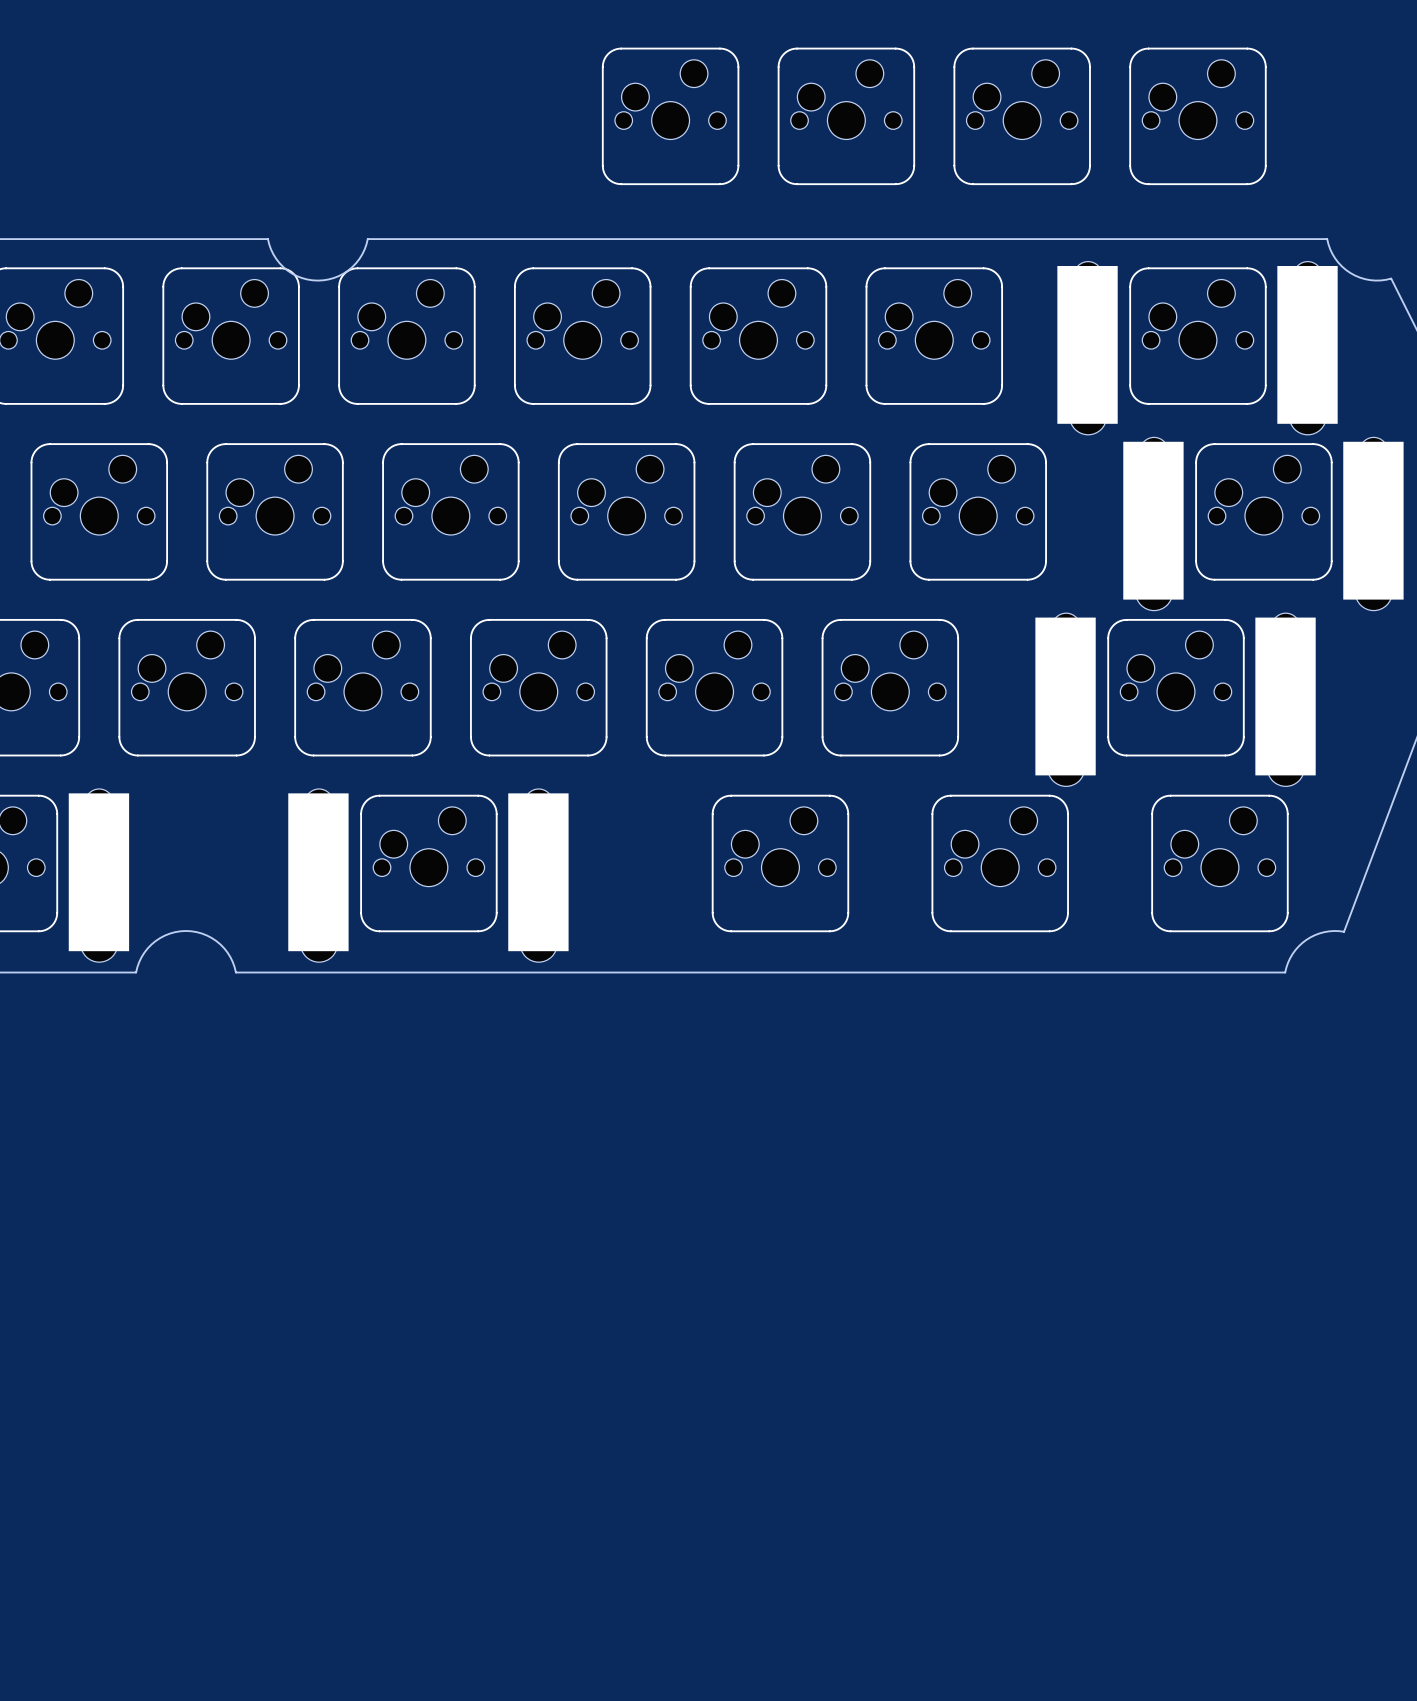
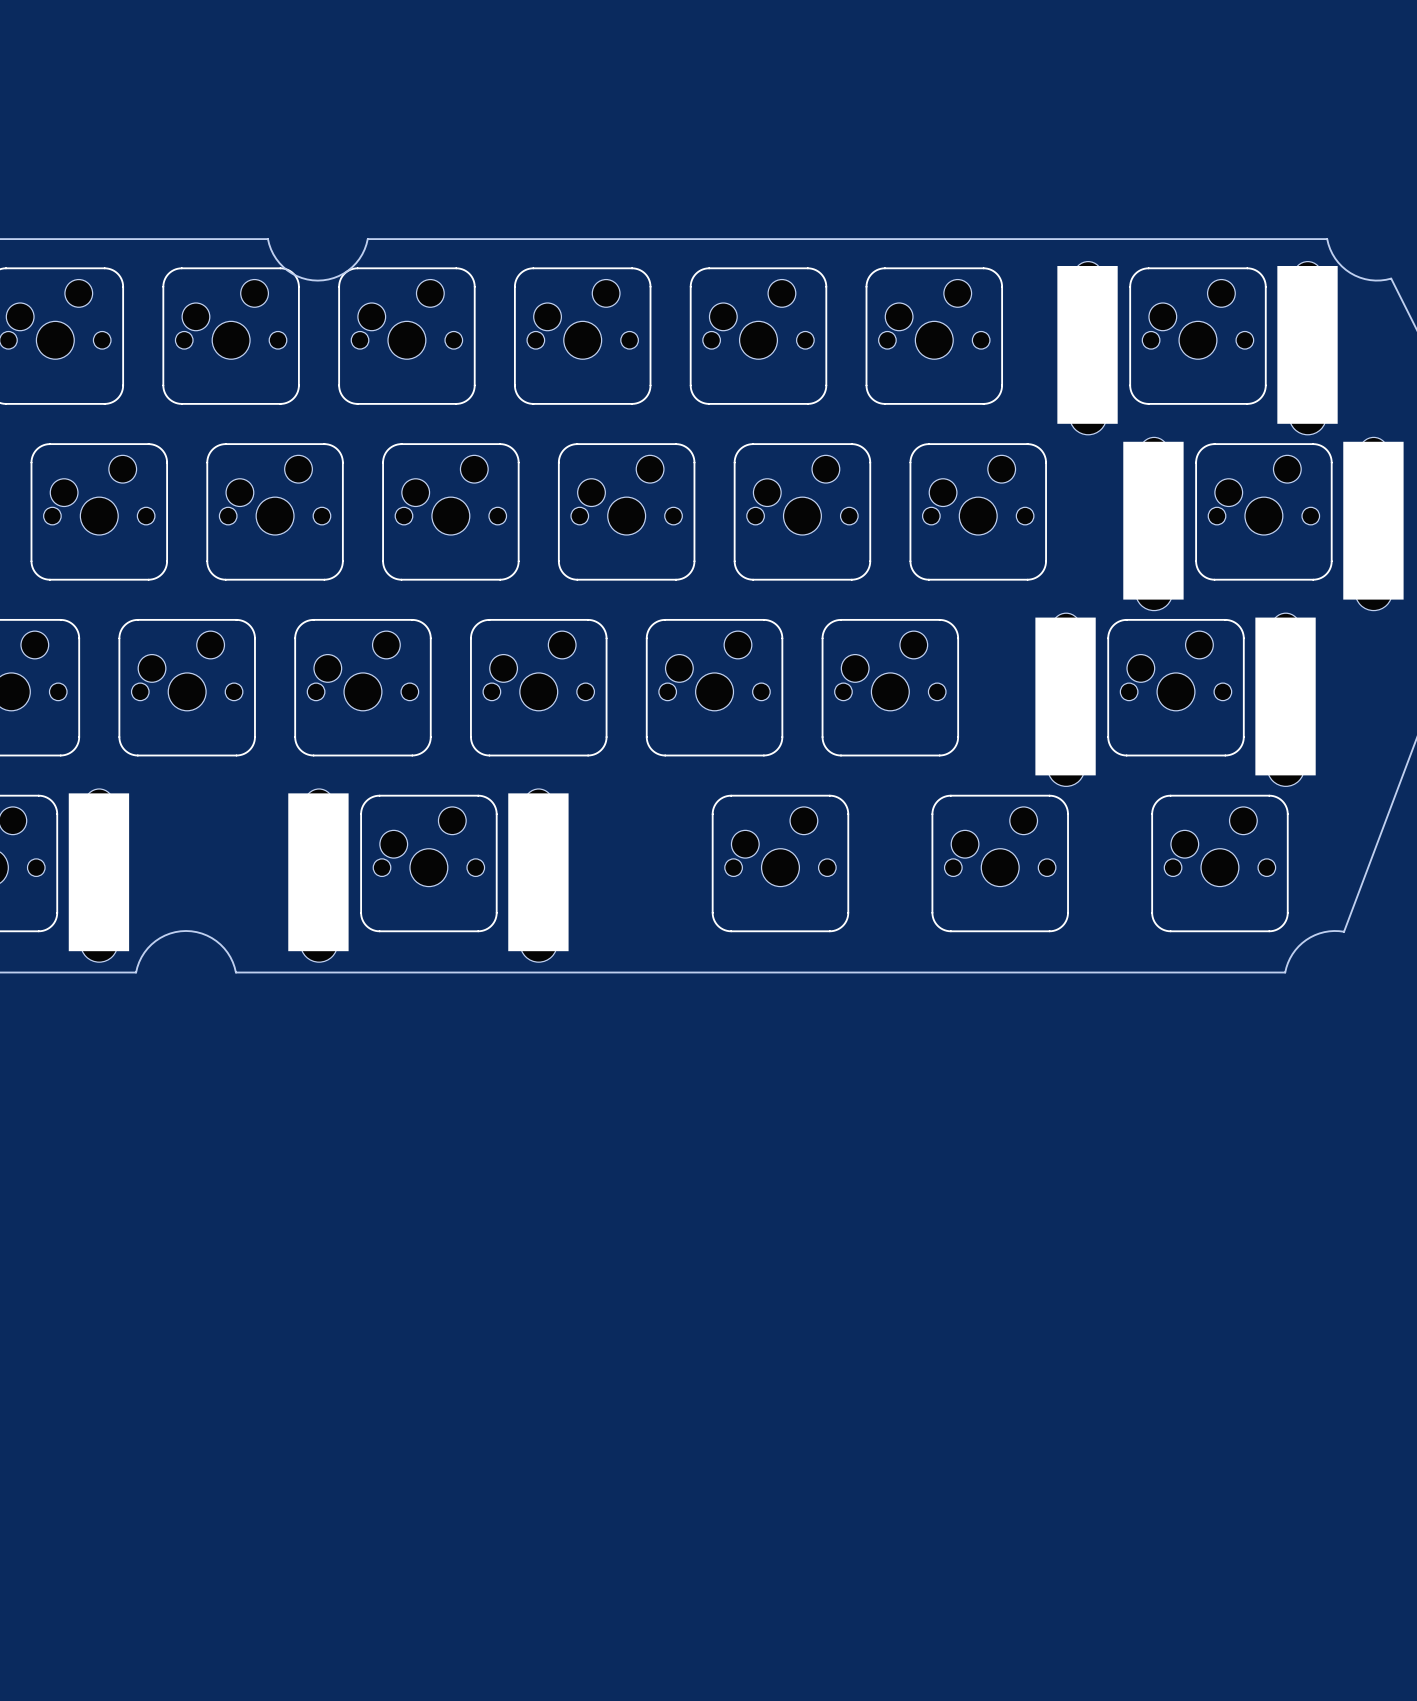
part: (670, 116) -> none
part: (846, 116) -> none
part: (1022, 116) -> none
part: (1197, 116) -> none

